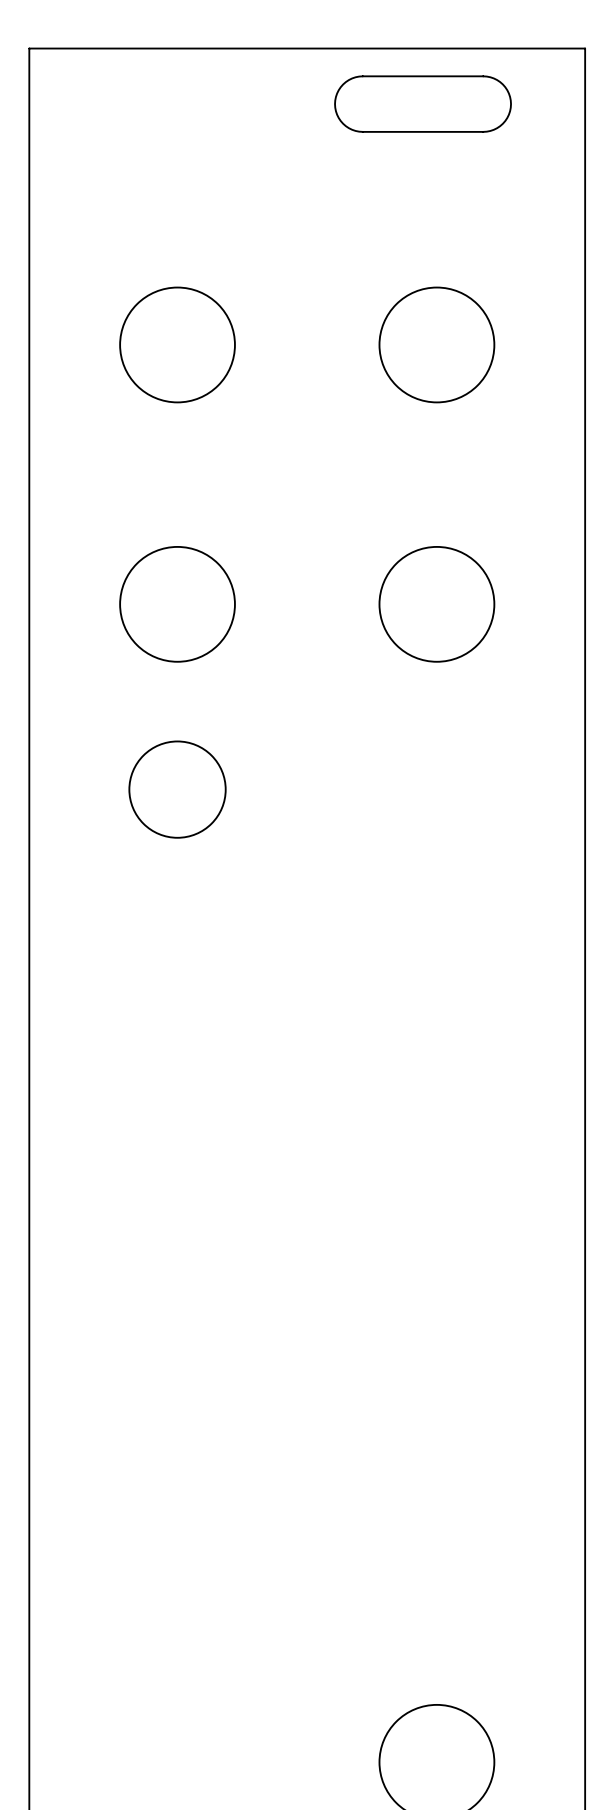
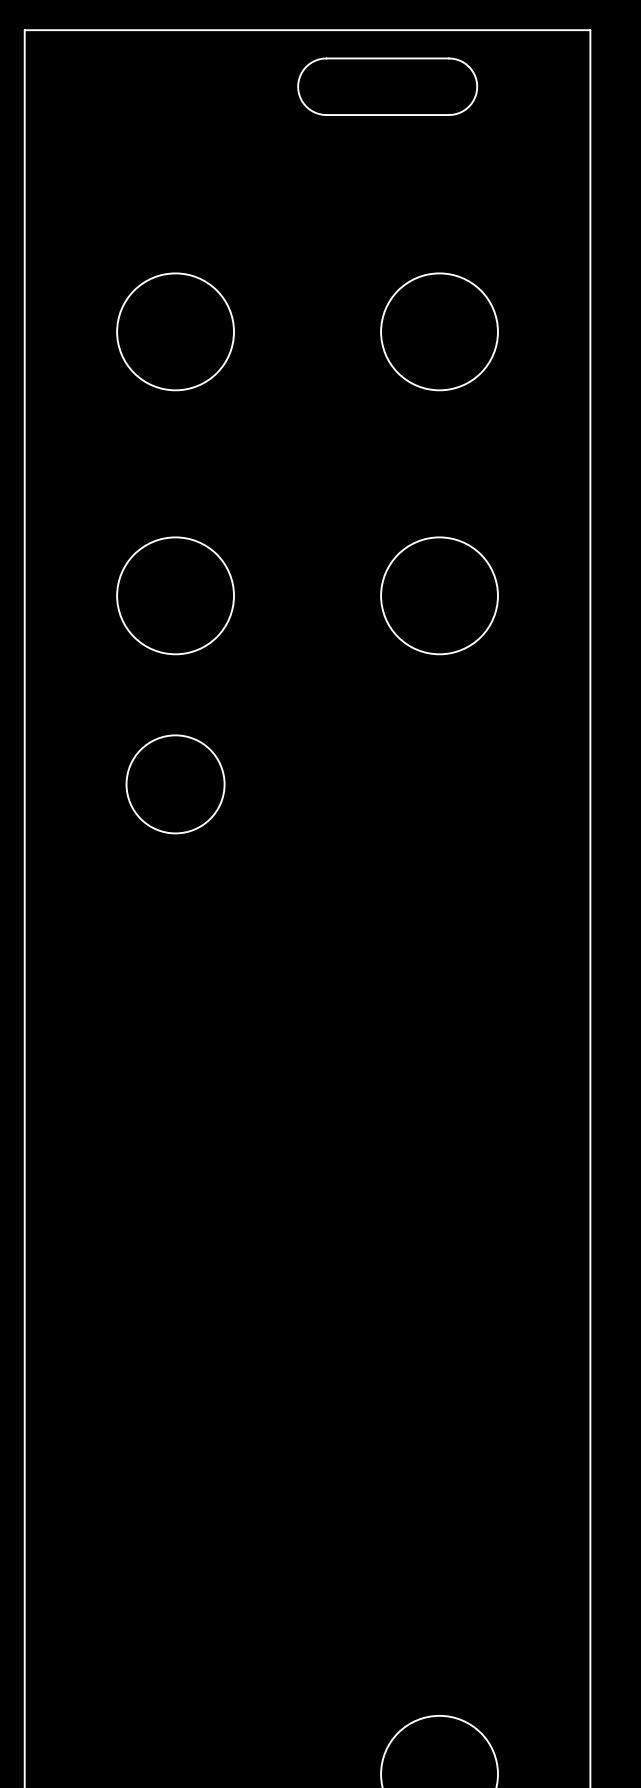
board edge: (362, 76) (352, 78) (343, 84) (337, 93) (335, 104) (337, 114) (343, 123) (352, 129) (362, 131) -> (364, 58) (326, 58) (315, 60) (303, 69) (298, 86) (303, 103) (315, 112) (326, 115) (364, 115)
board edge: (446, 76) (483, 76) (493, 78) (505, 87) (511, 104) (505, 121) (493, 129) (483, 131) (446, 131) -> (448, 58) (459, 60) (468, 66) (475, 75) (477, 86) (475, 97) (468, 106) (459, 112) (448, 115)

